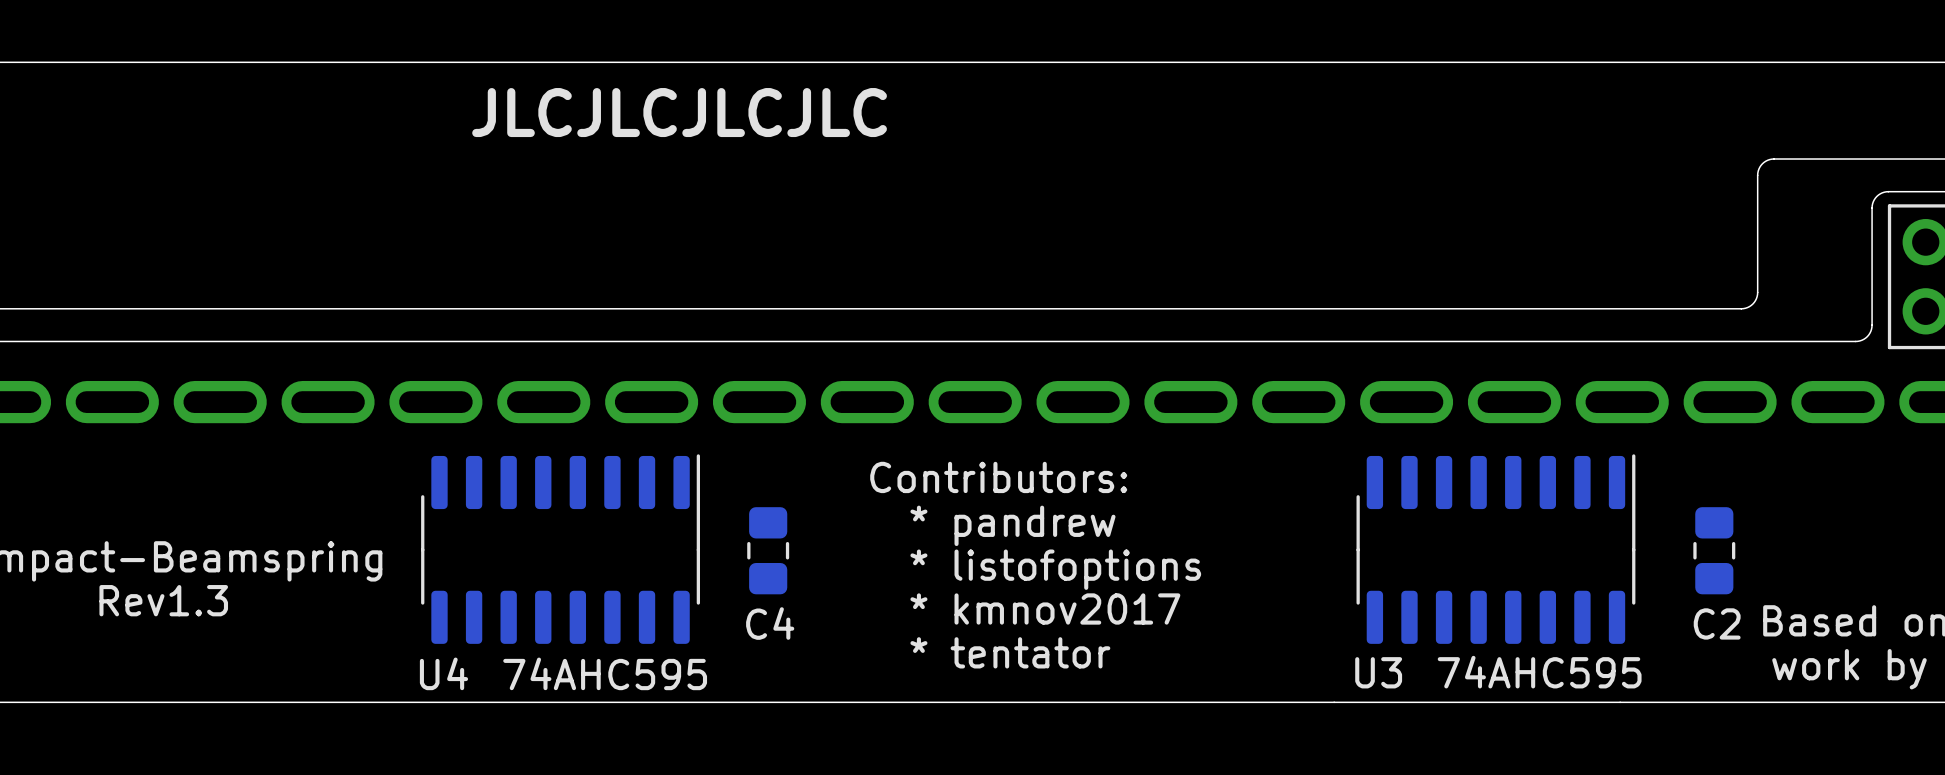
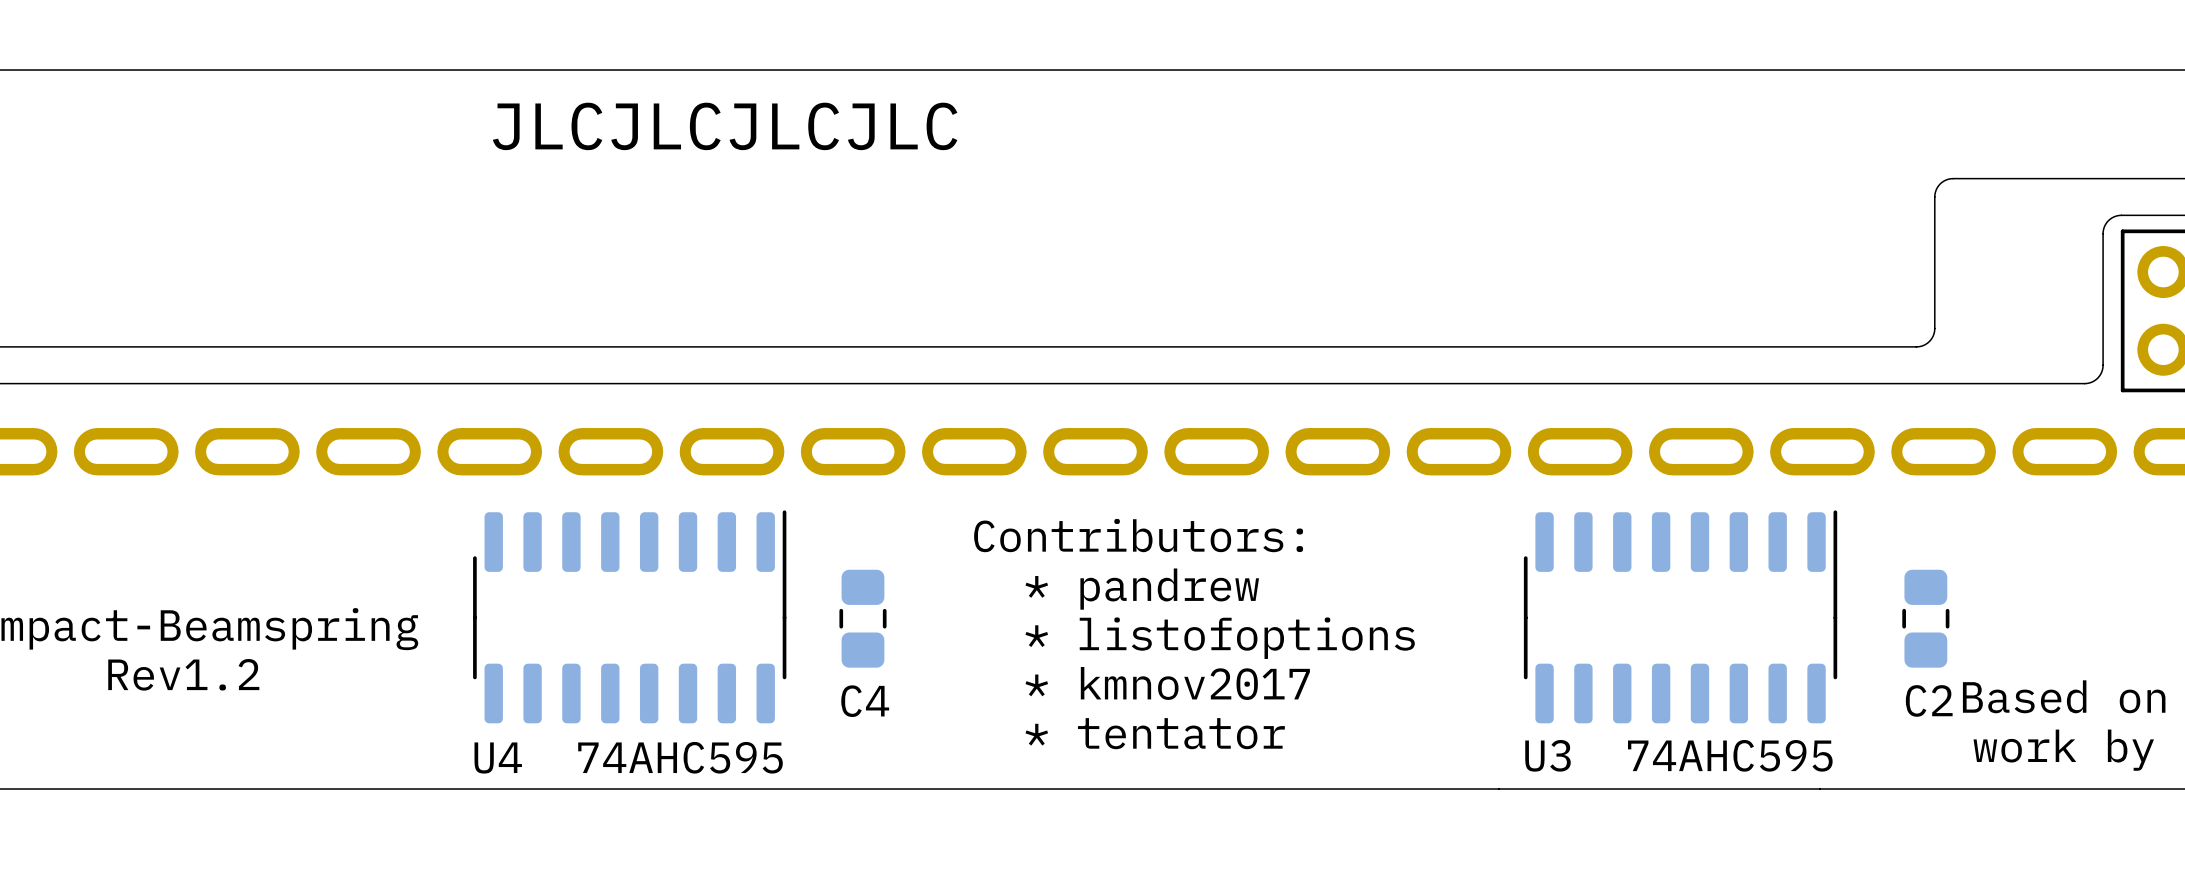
text position: JLCJLCJLCJLC (679, 112) -> JLCJLCJLCJLC (725, 126)
board edge: (1774, 159) (1762, 163) (1757, 173) (1756, 298) (1752, 304) (1745, 308) (1705, 308) -> (1992, 178) (1948, 179) (1941, 182) (1936, 189) (1934, 330) (1927, 343) (1916, 346)
text: Rev1.3 (163, 600) -> Rev1.2 (183, 674)

